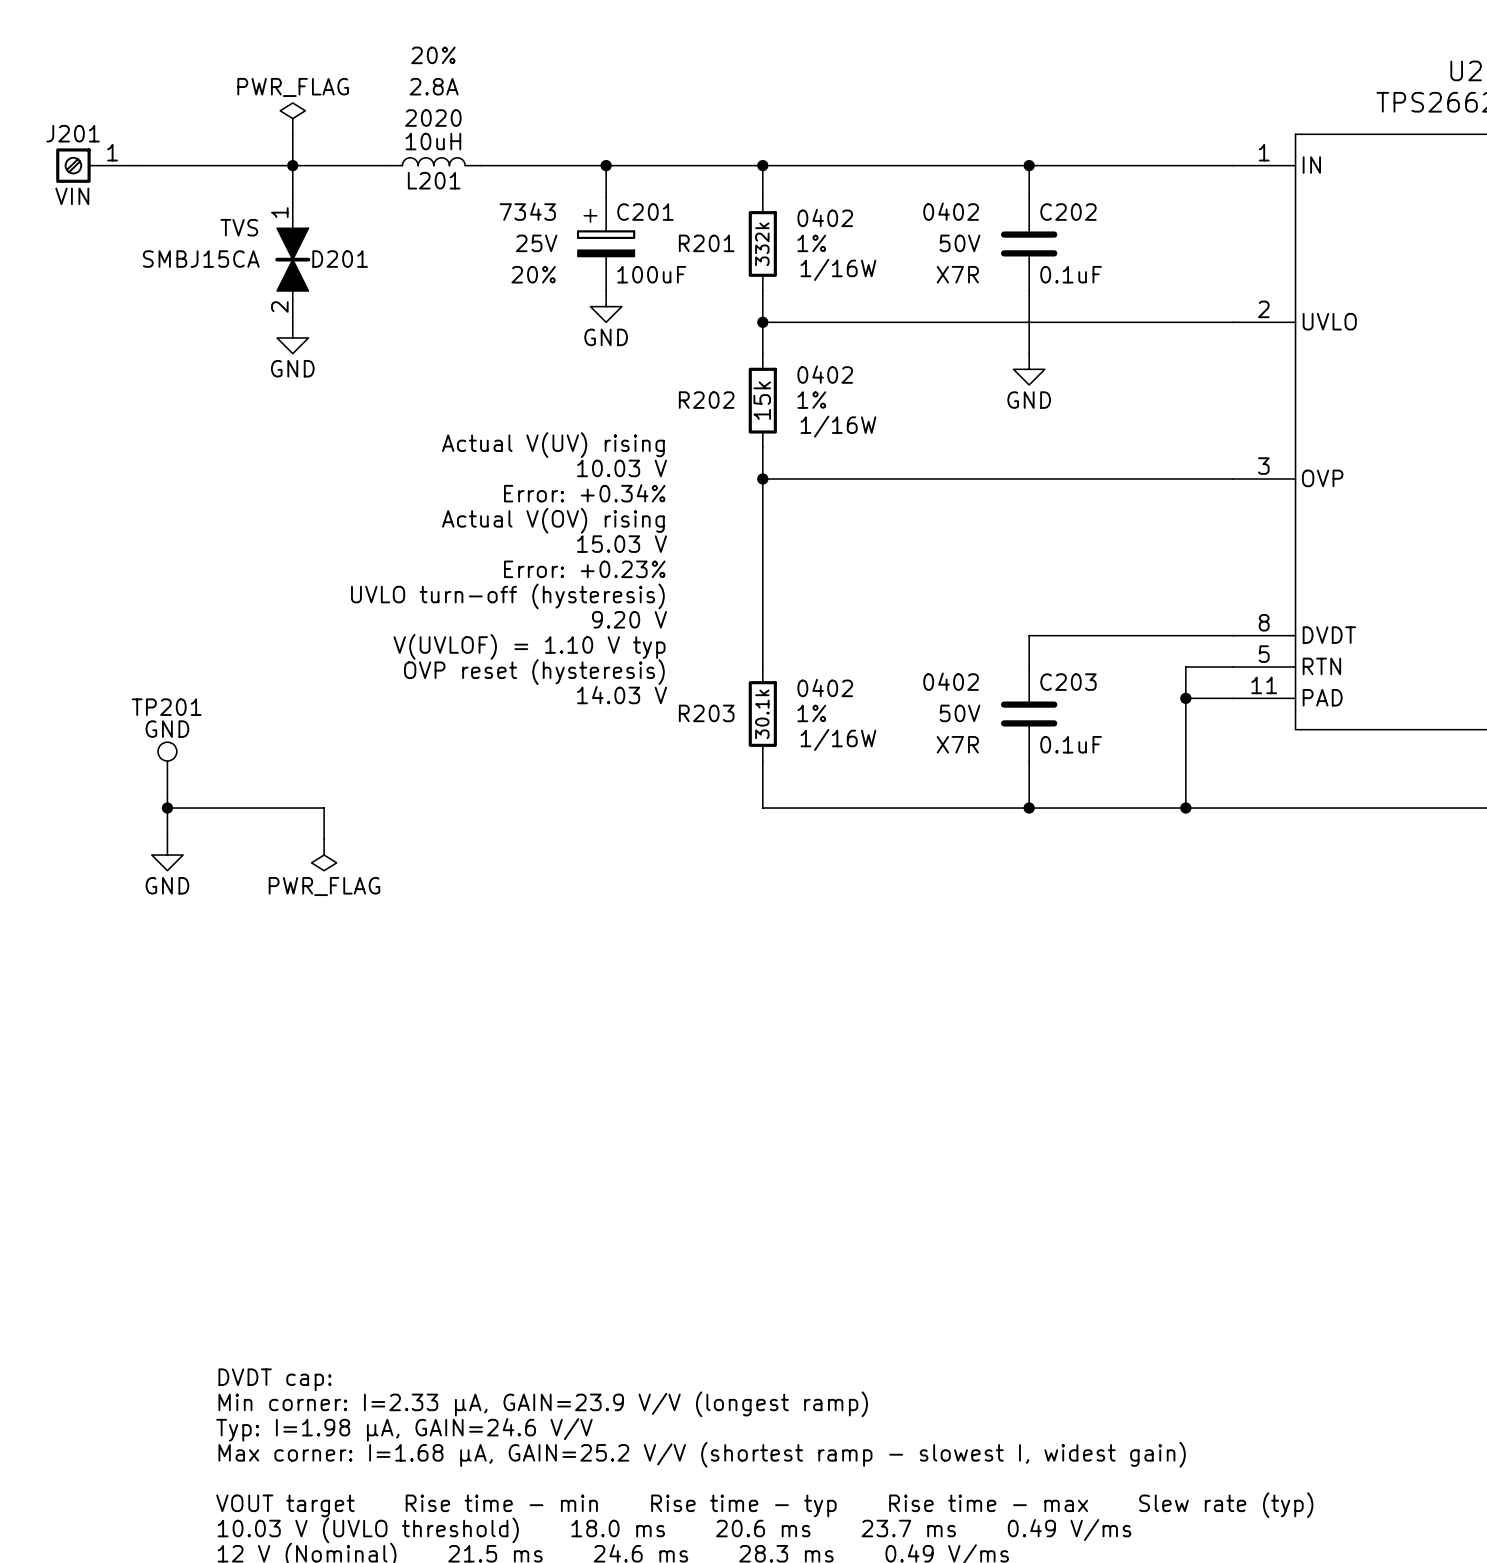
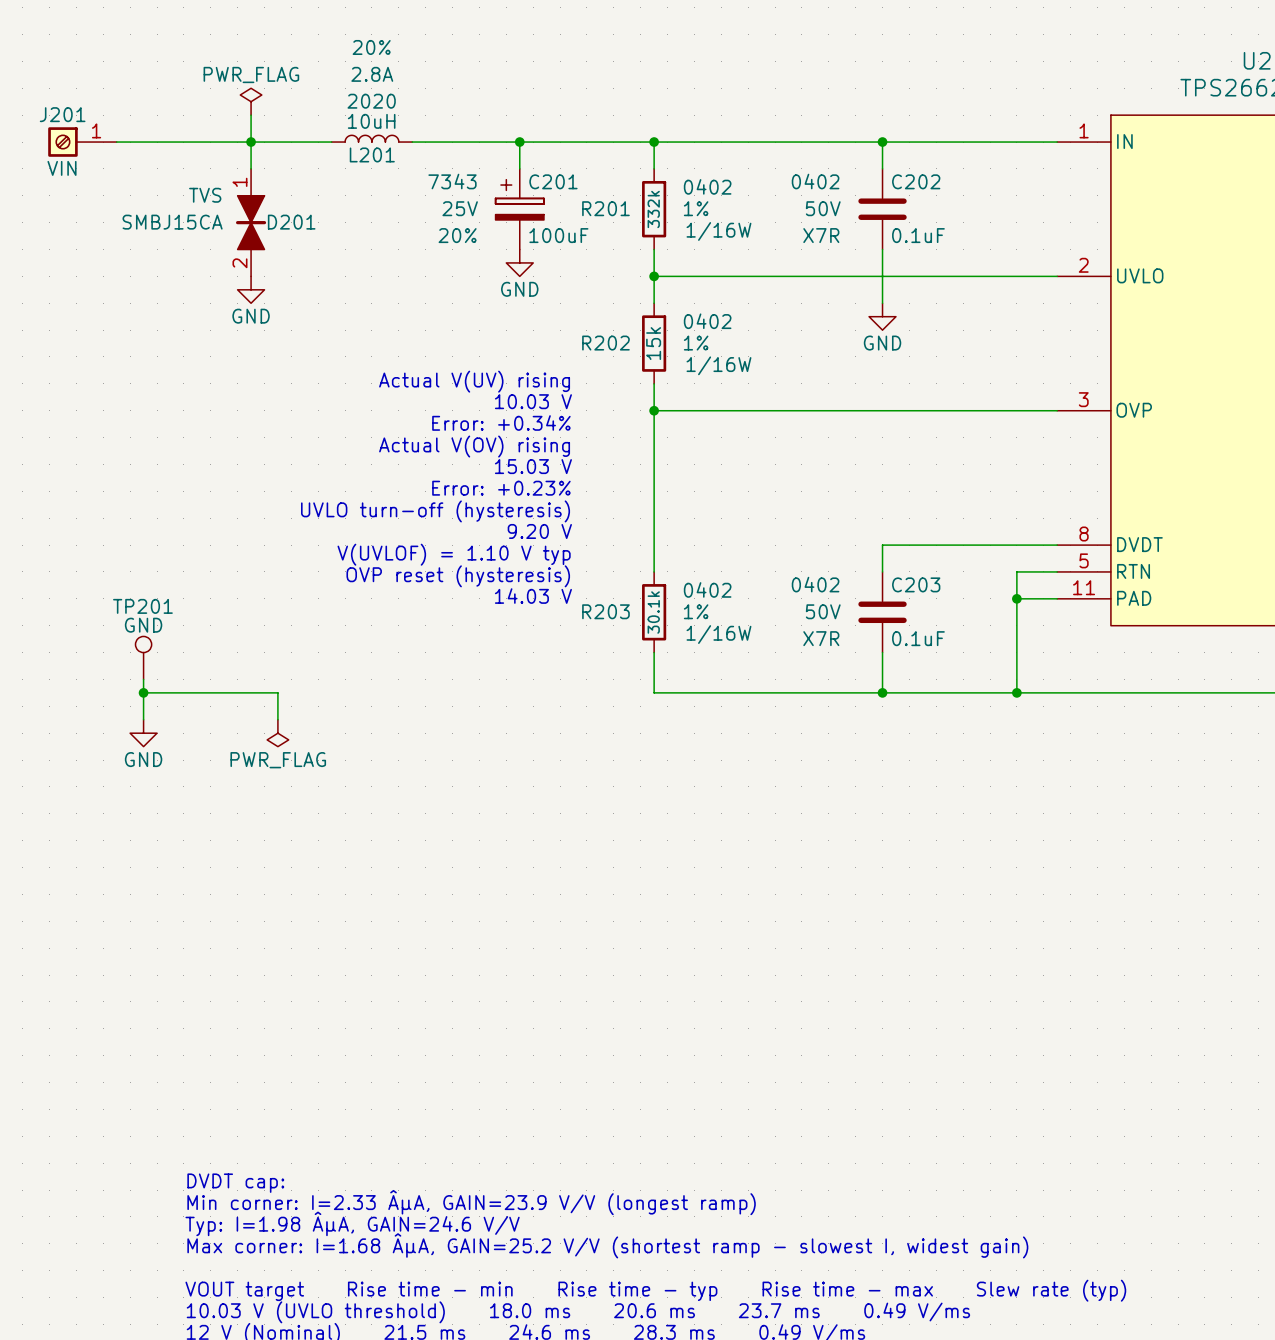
text: Min corner: I=2.33 µA, GAIN=23.9 V/V (longest ramp) (543, 1404) -> Min corner: I=2.33 ÂµA, GAIN=23.9 V/V (longest ramp) (471, 1202)
text: Typ: I=1.98 µA, GAIN=24.6 V/V (404, 1429) -> Typ: I=1.98 ÂµA, GAIN=24.6 V/V (352, 1223)
text: Max corner: I=1.68 µA, GAIN=25.2 V/V (shortest ramp - slowest I, widest gain) (702, 1454) -> Max corner: I=1.68 ÂµA, GAIN=25.2 V/V (shortest ramp - slowest I, widest gain) (607, 1245)

